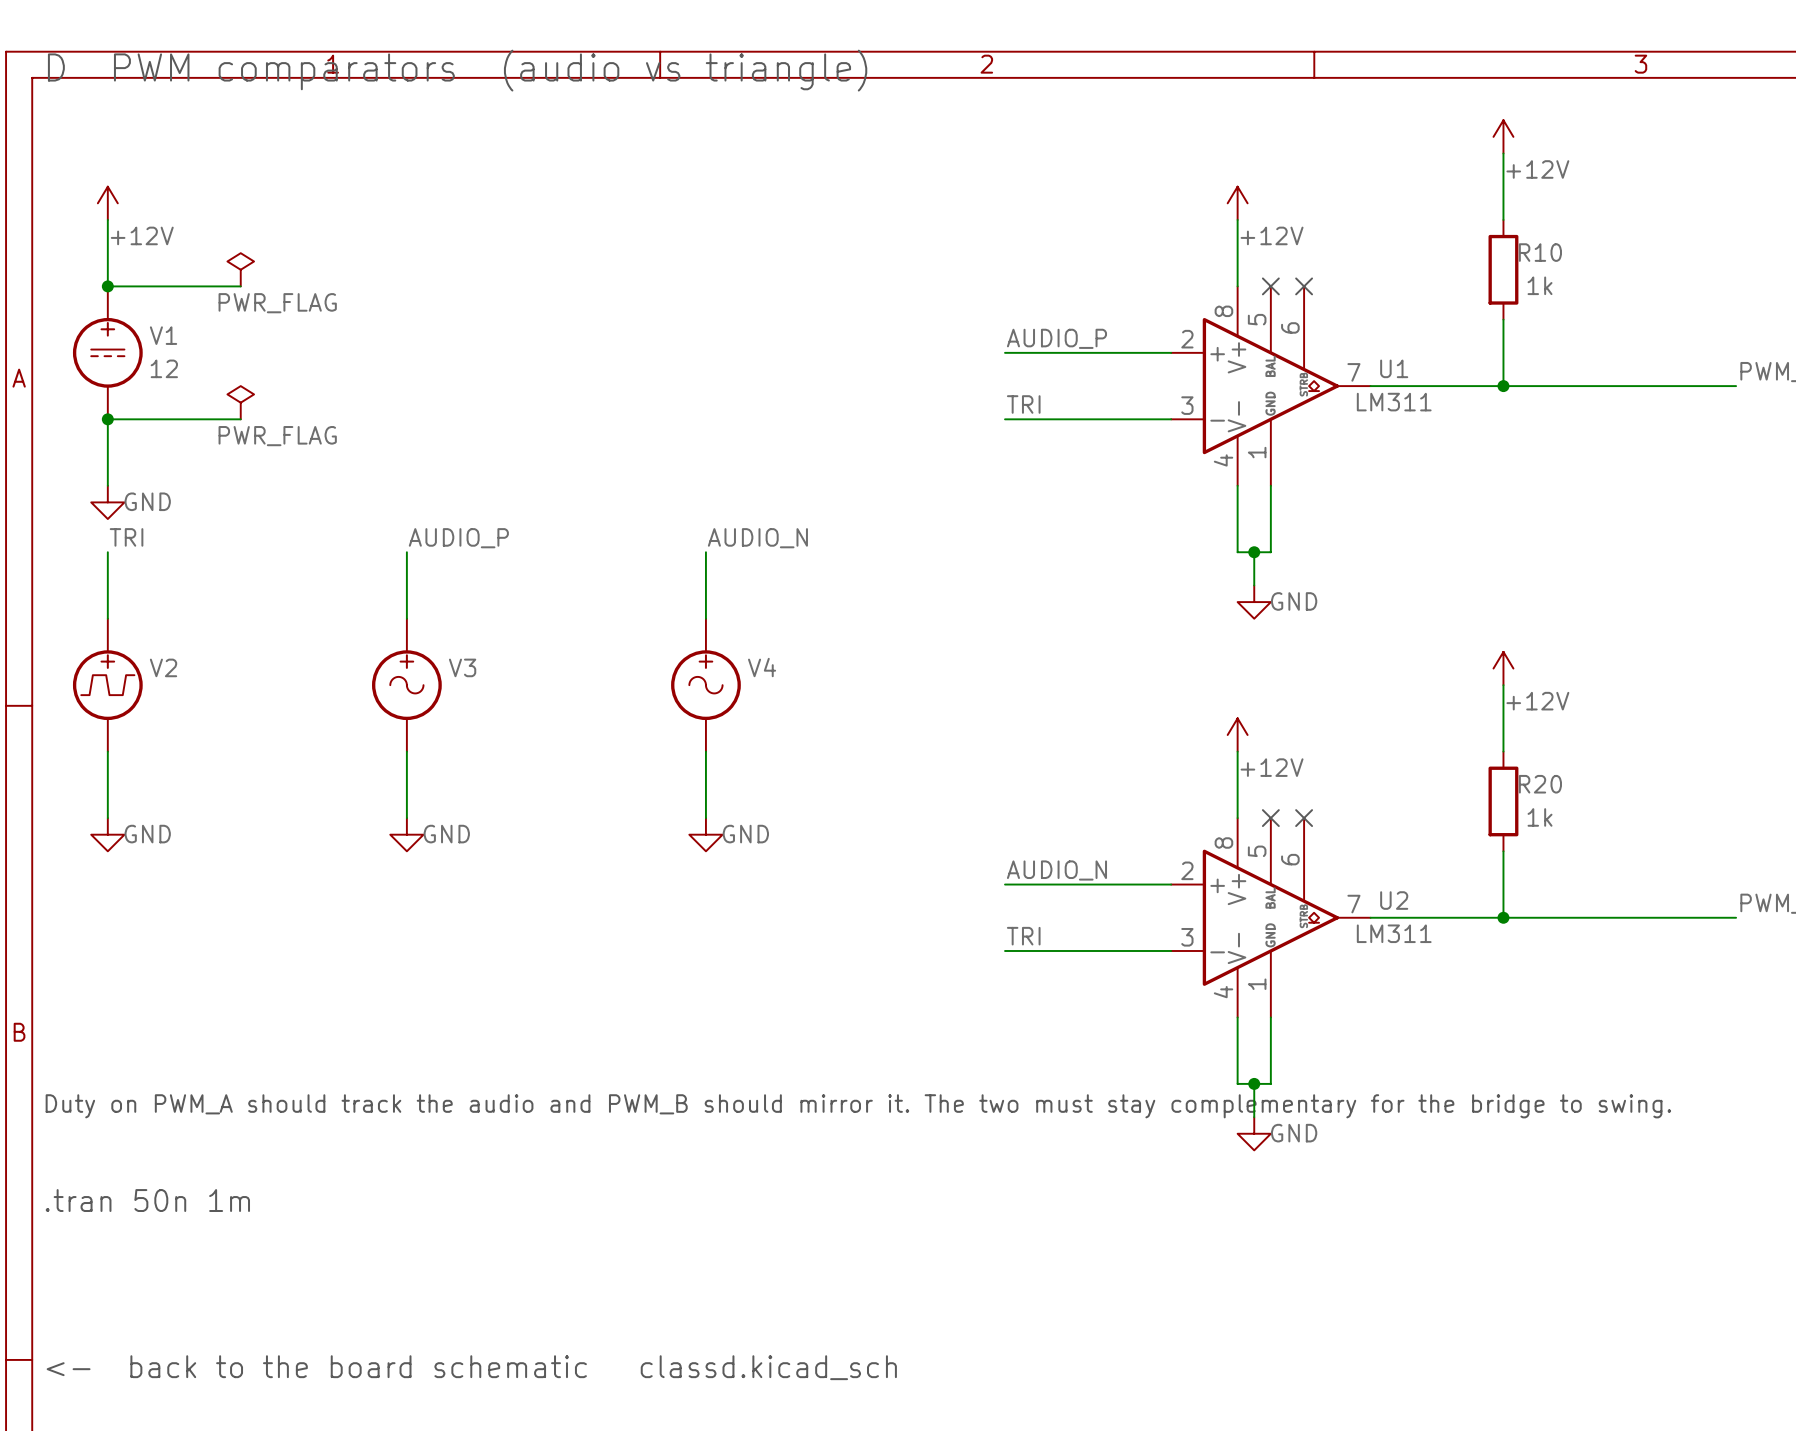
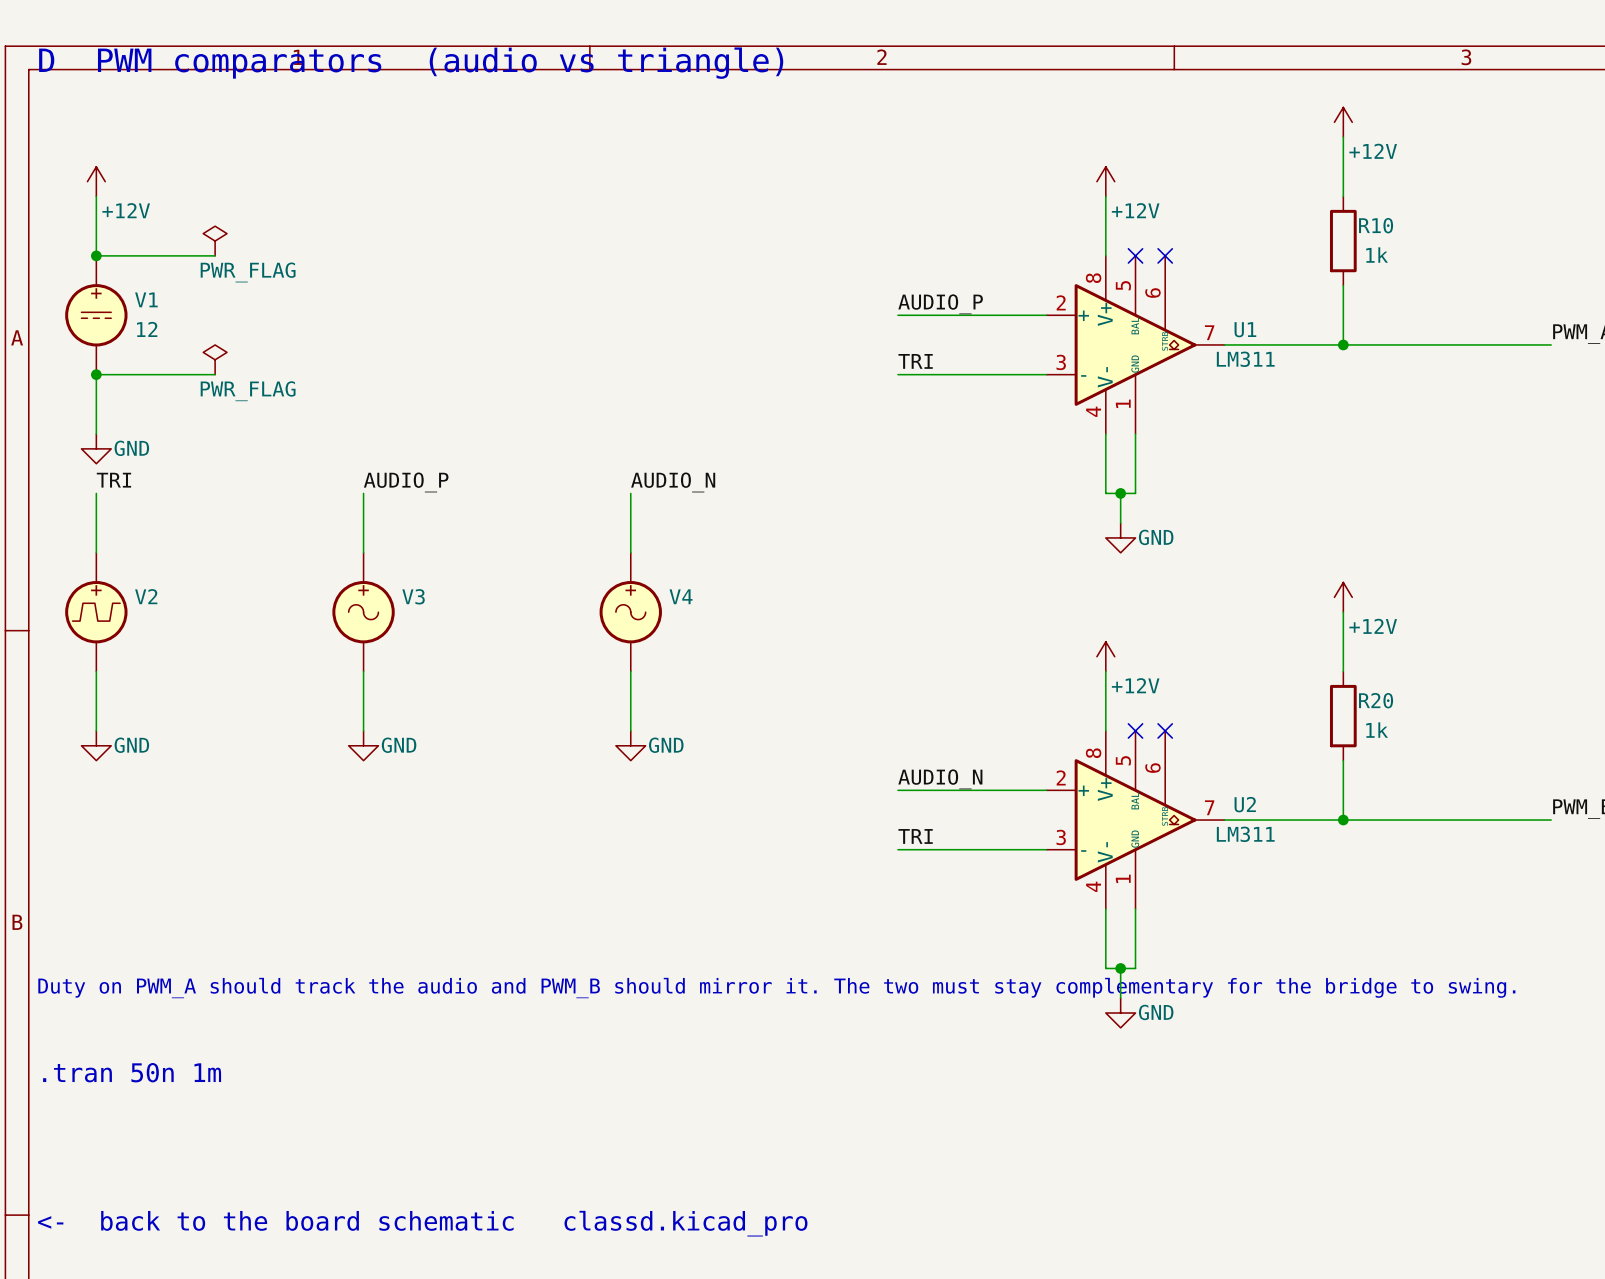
text: <- back to the board schematic classd.kicad_sch (471, 1367) -> <- back to the board schematic classd.kicad_pro (422, 1223)

